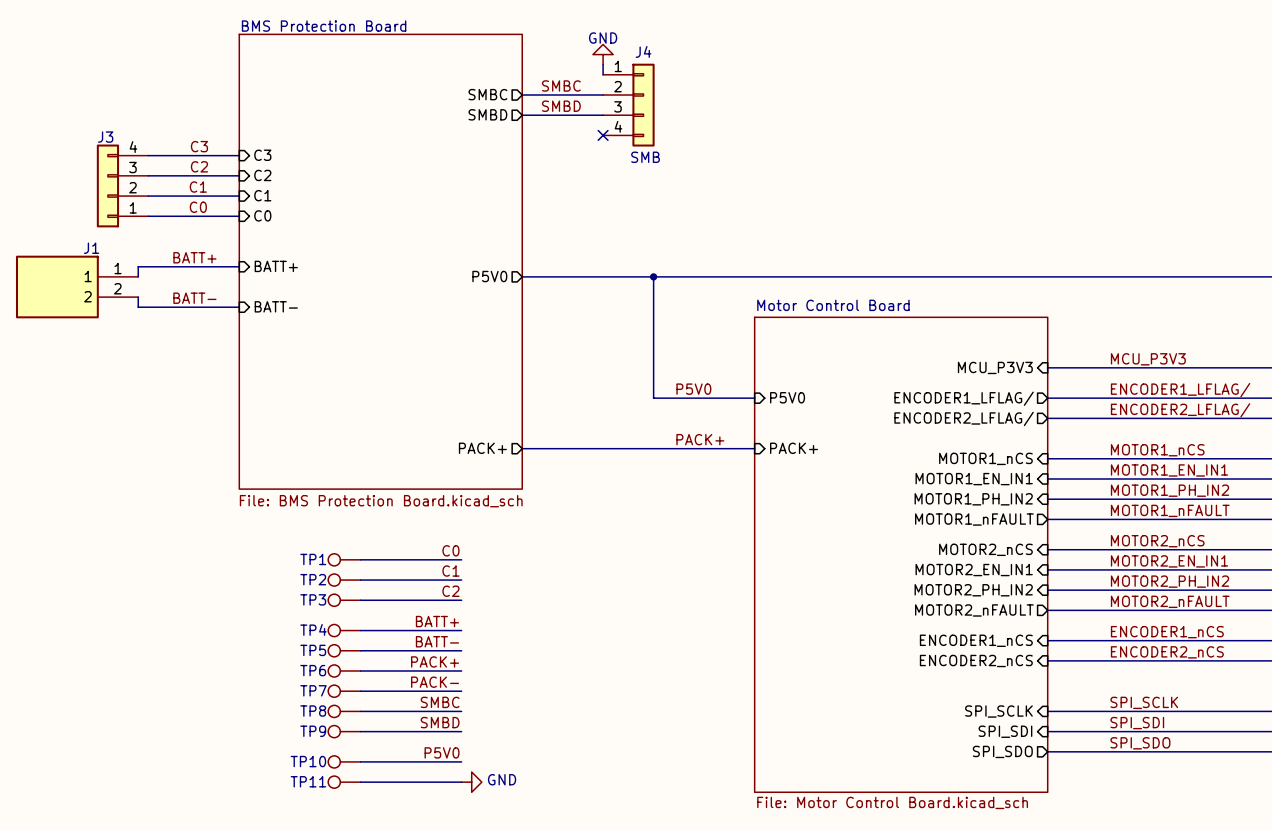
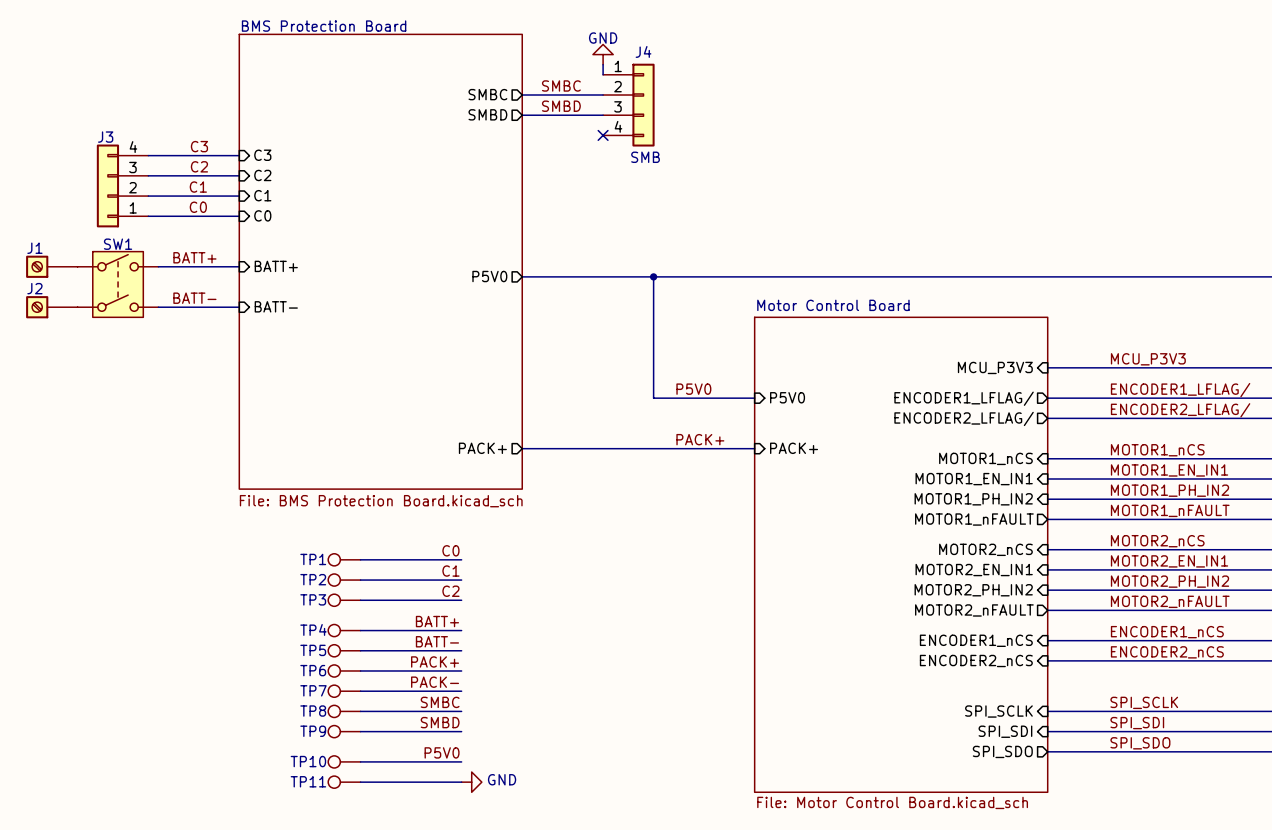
J1 name position: J1 (91, 248) -> J1 (34, 248)
J1 symbol: [15, 255, 139, 319] -> [26, 255, 78, 278]
SW1: none -> (118, 284)
J2: none -> (51, 307)

